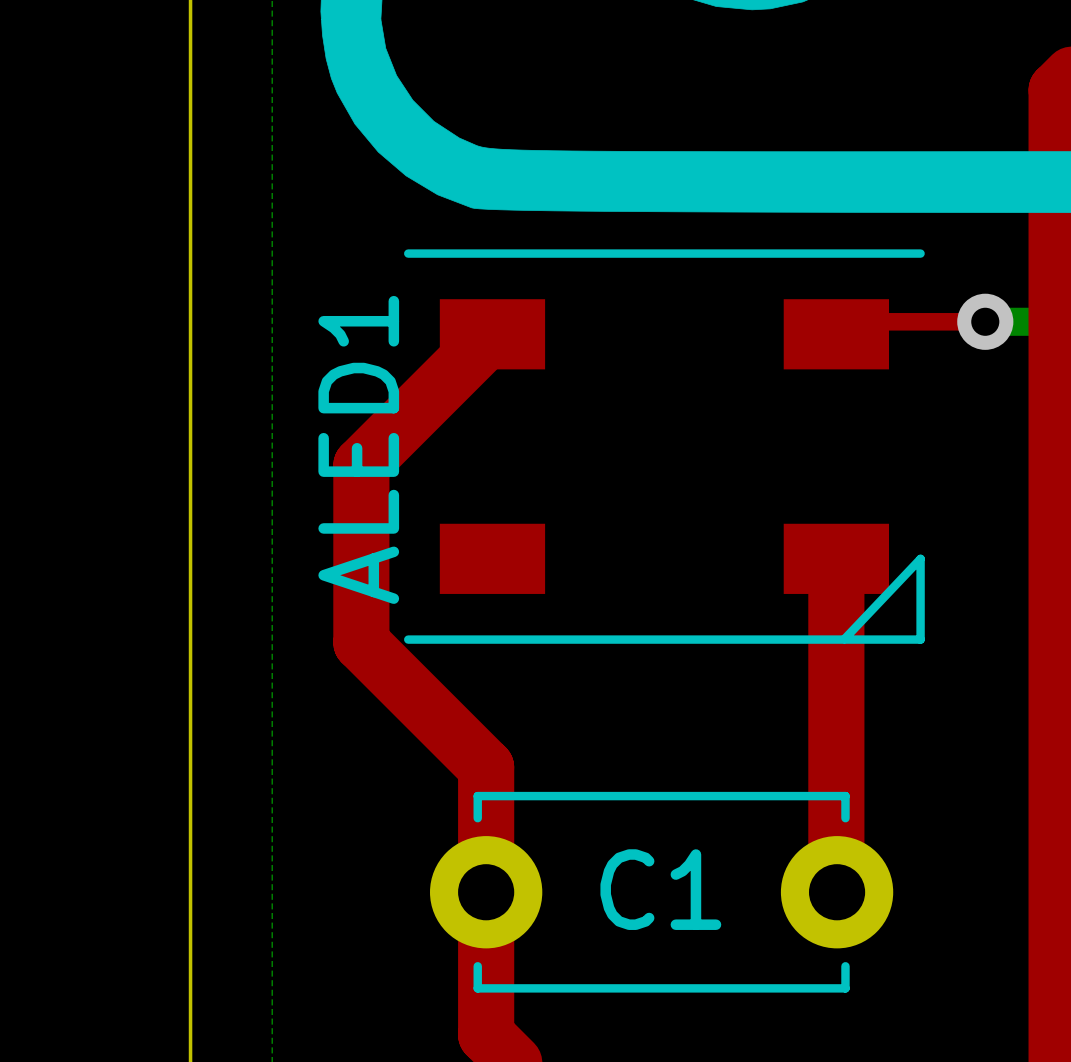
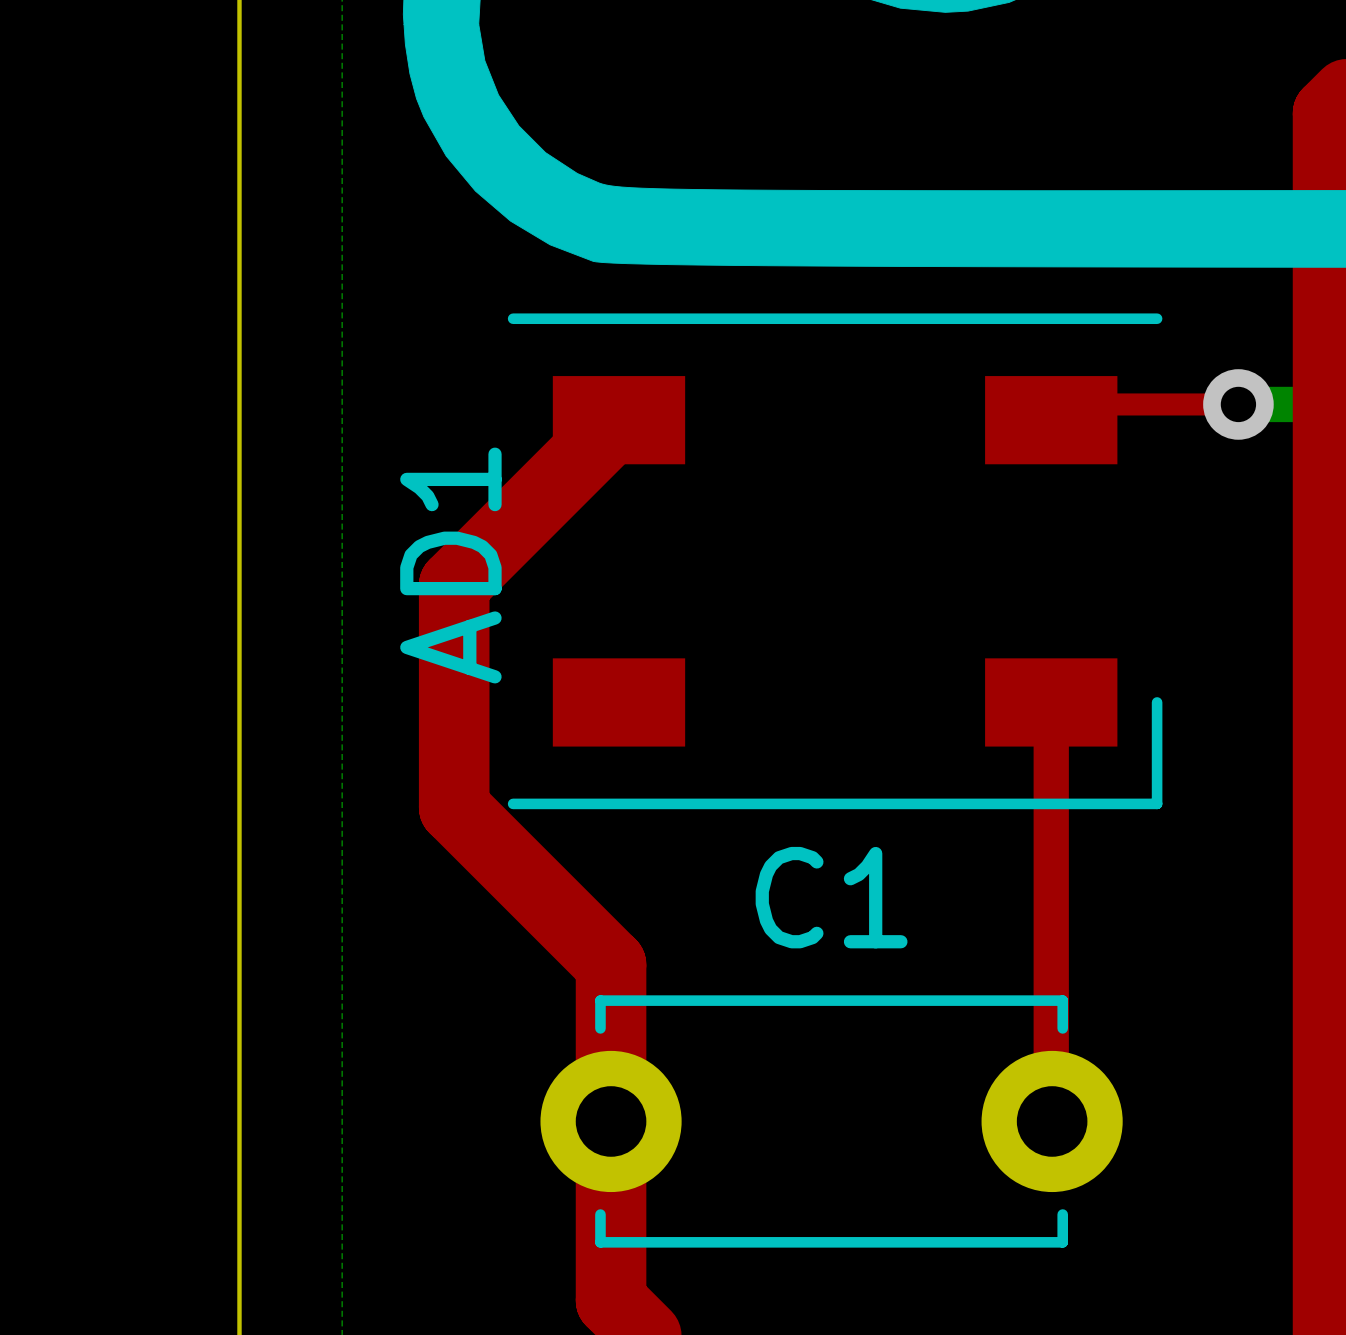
ALED1 name: ALED1 (358, 449) -> AD1 (450, 565)
top track width: thick (836, 558) (836, 891) -> thin (1051, 702) (1051, 1120)
line: (920, 558) (844, 639) -> none
C1 name position: C1 (660, 889) -> C1 (831, 897)

